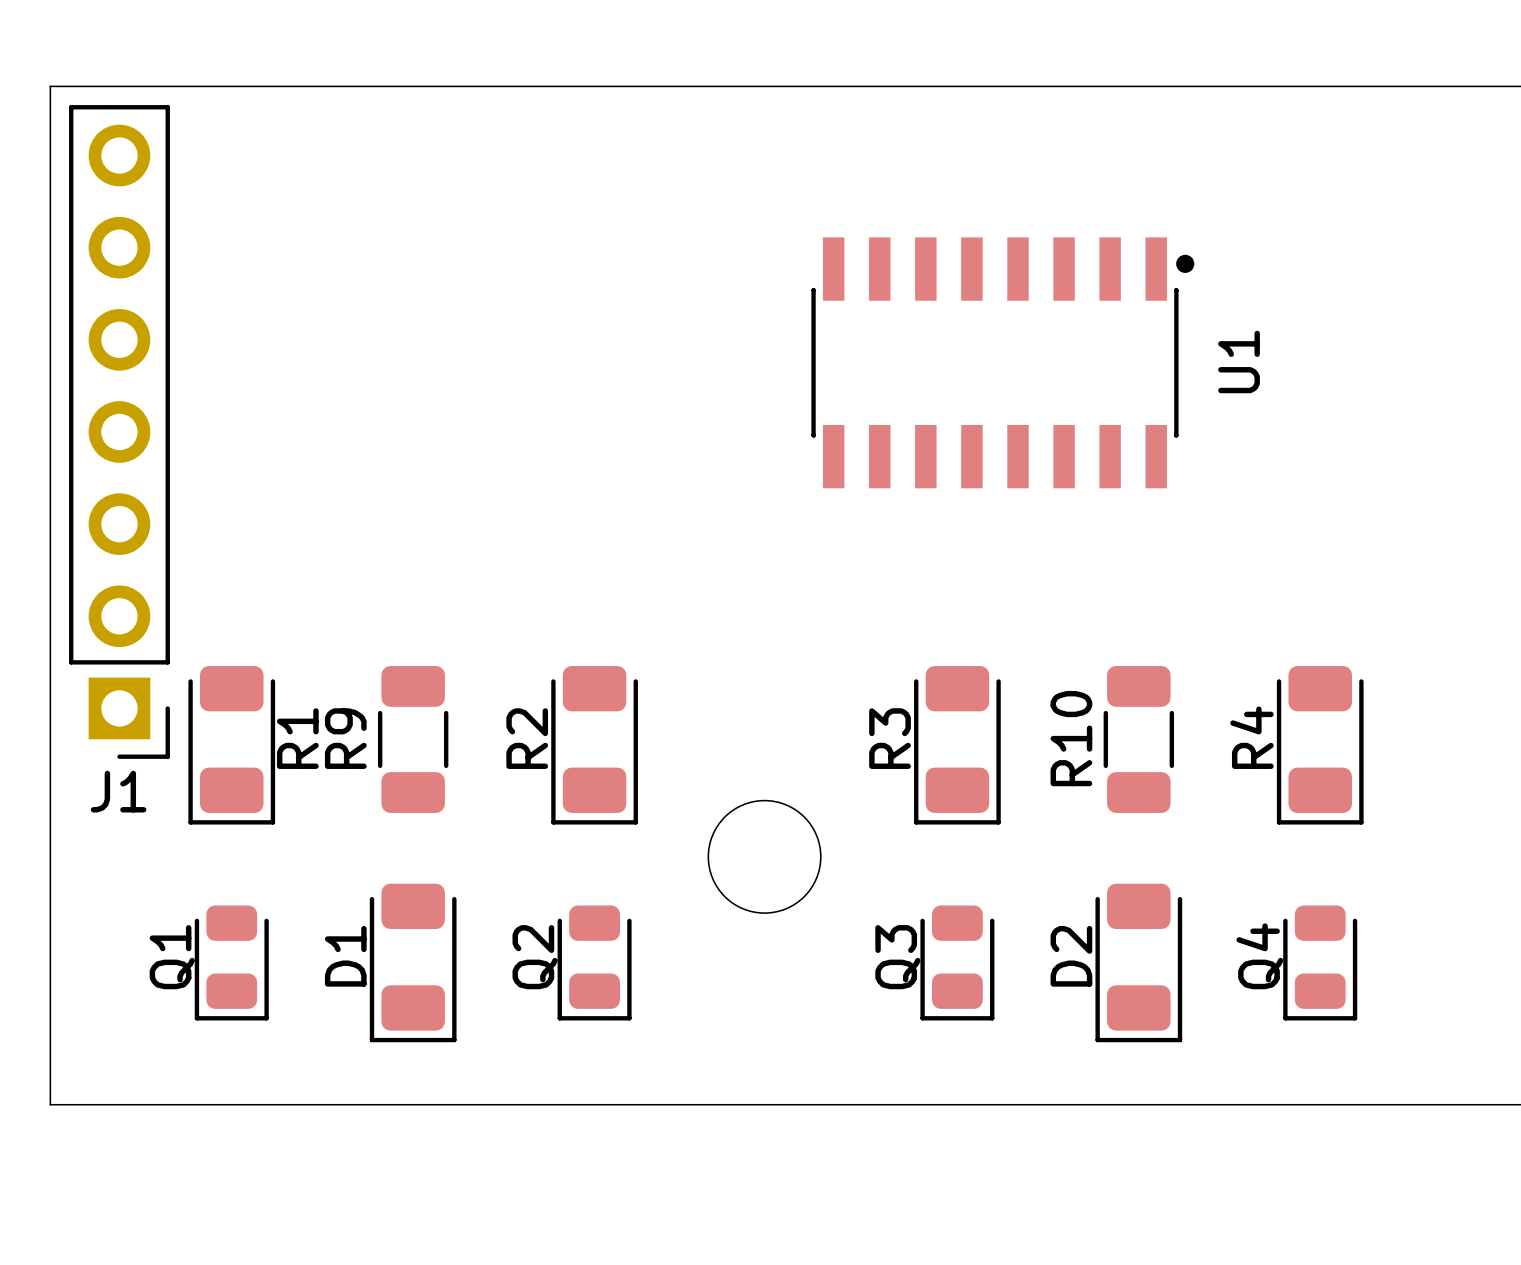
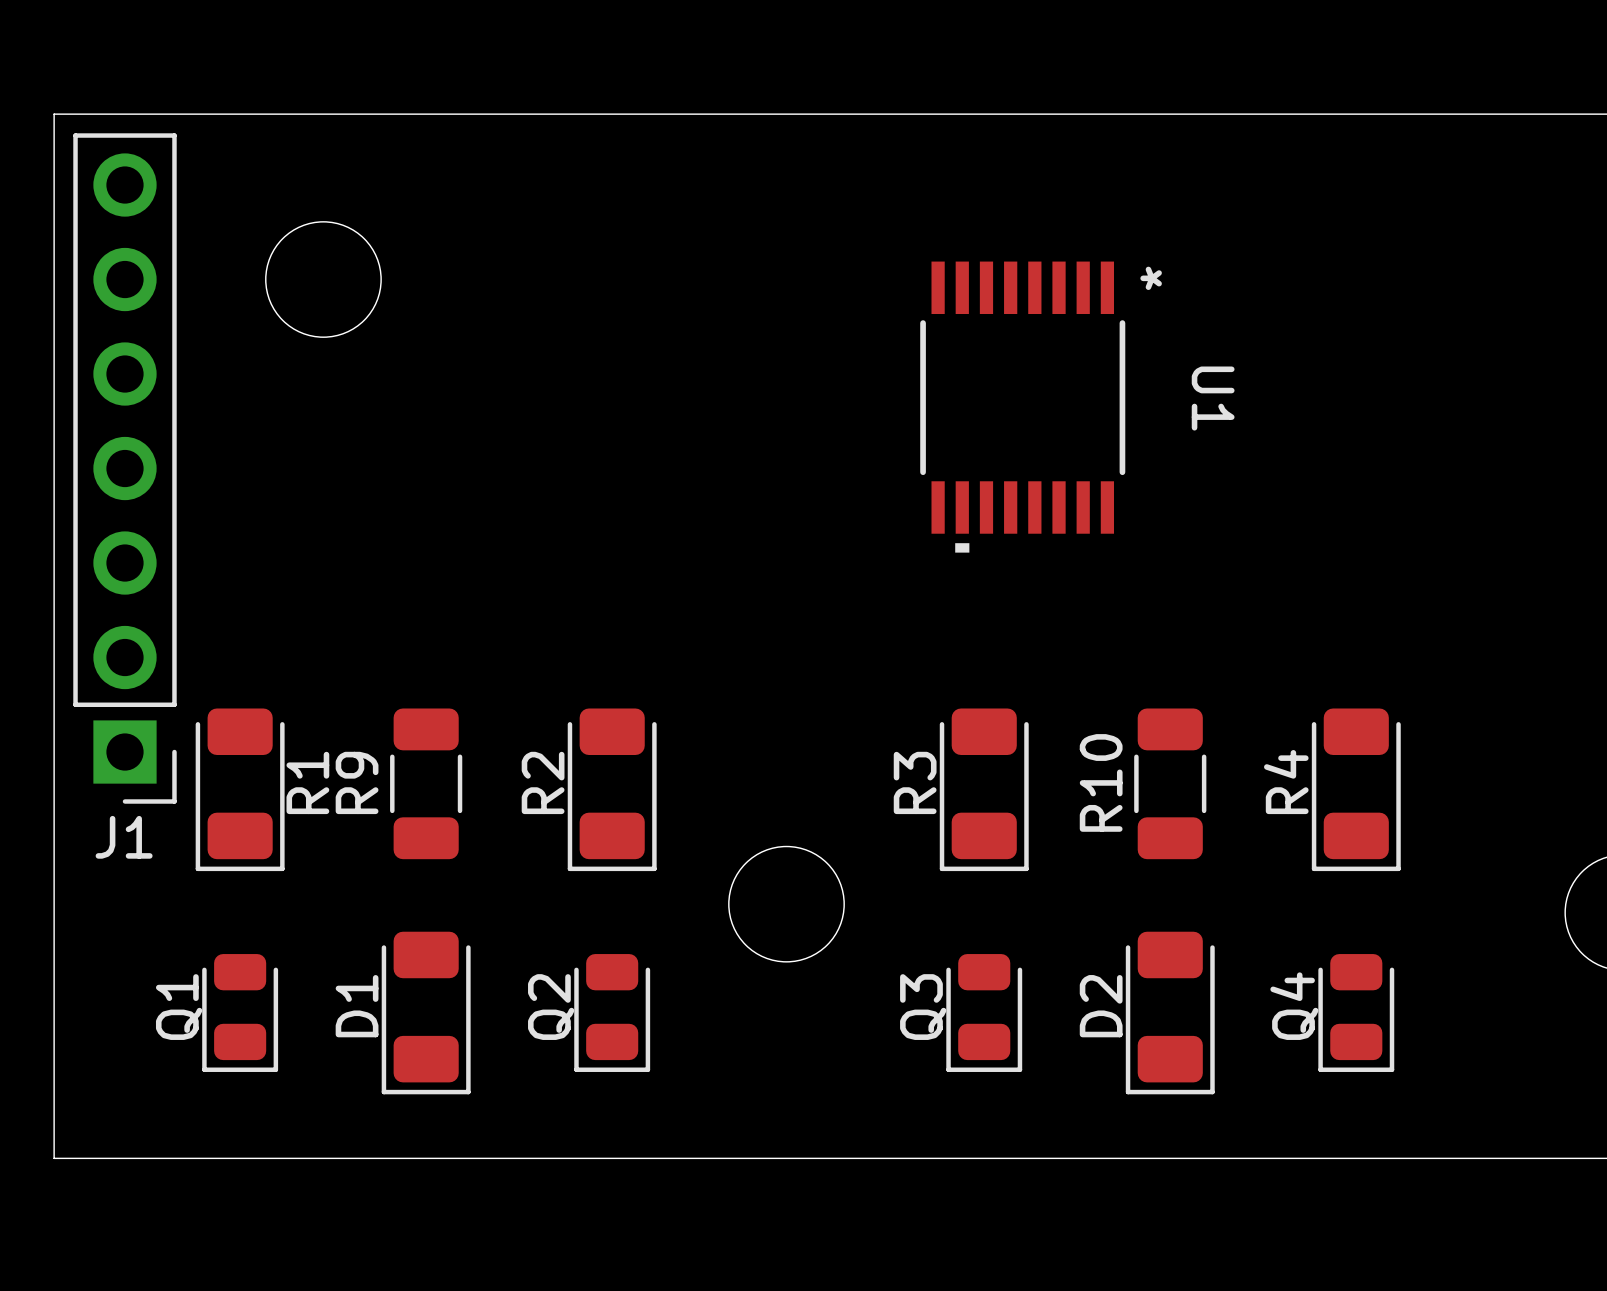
round board edge: none -> [265, 221, 382, 338]
U1 footprint: [811, 237, 1195, 489] -> [920, 261, 1126, 553]

